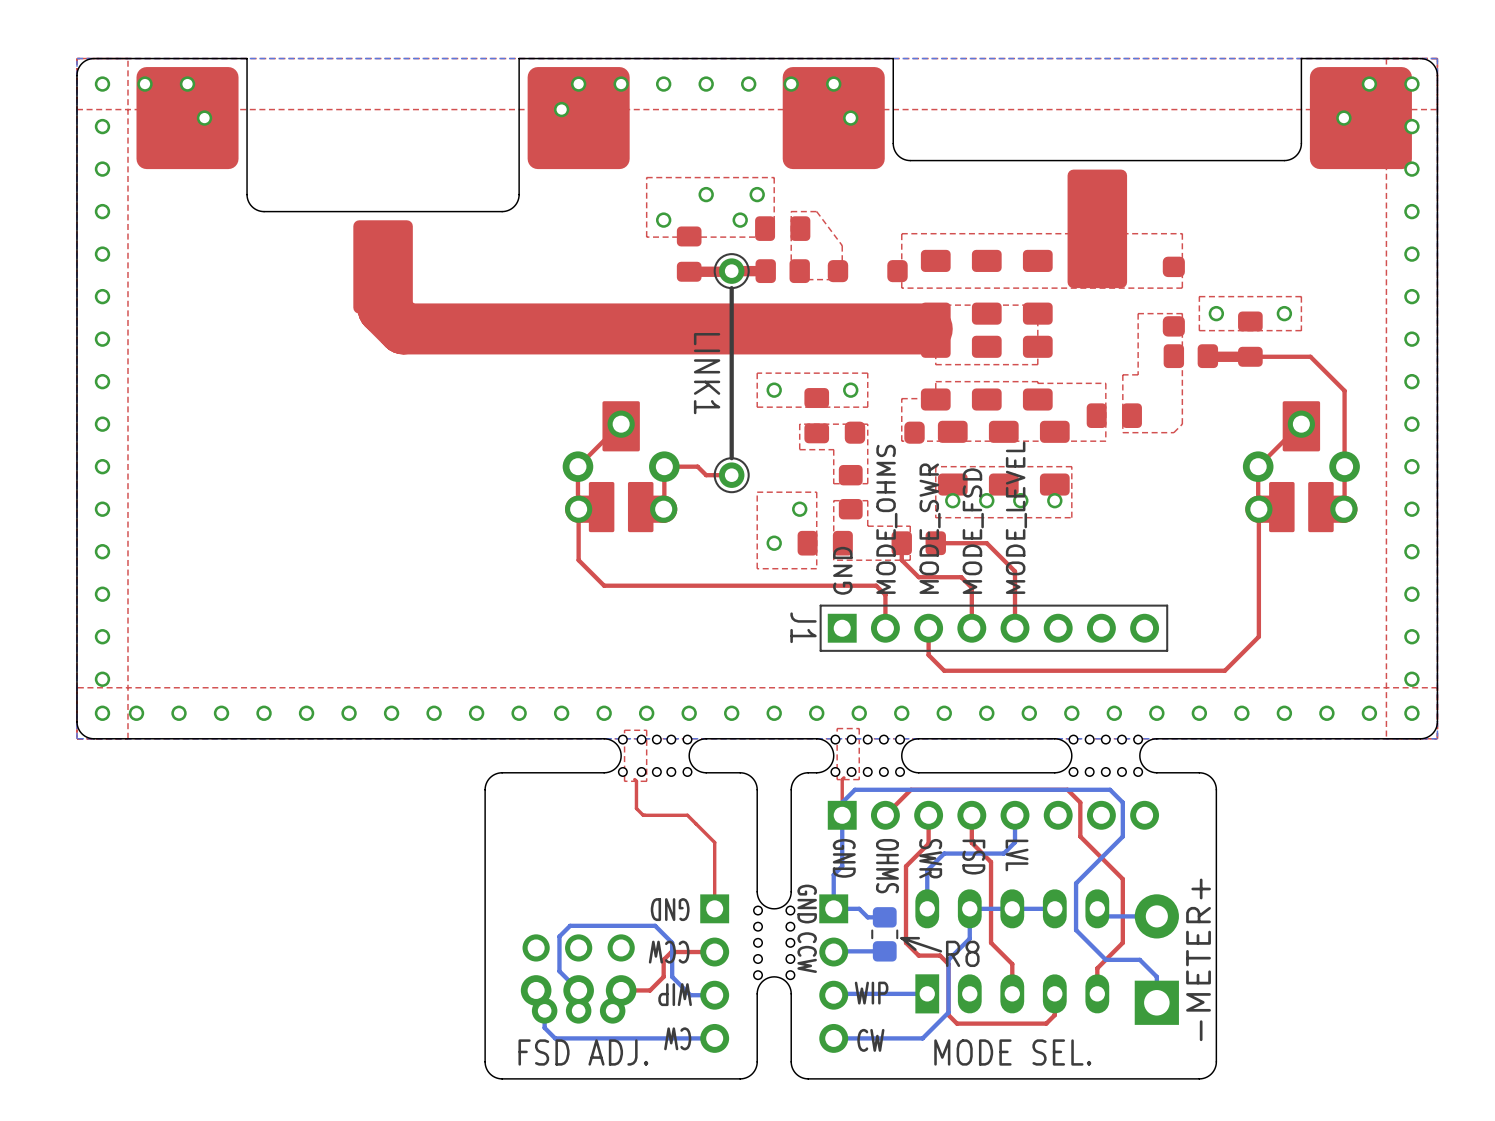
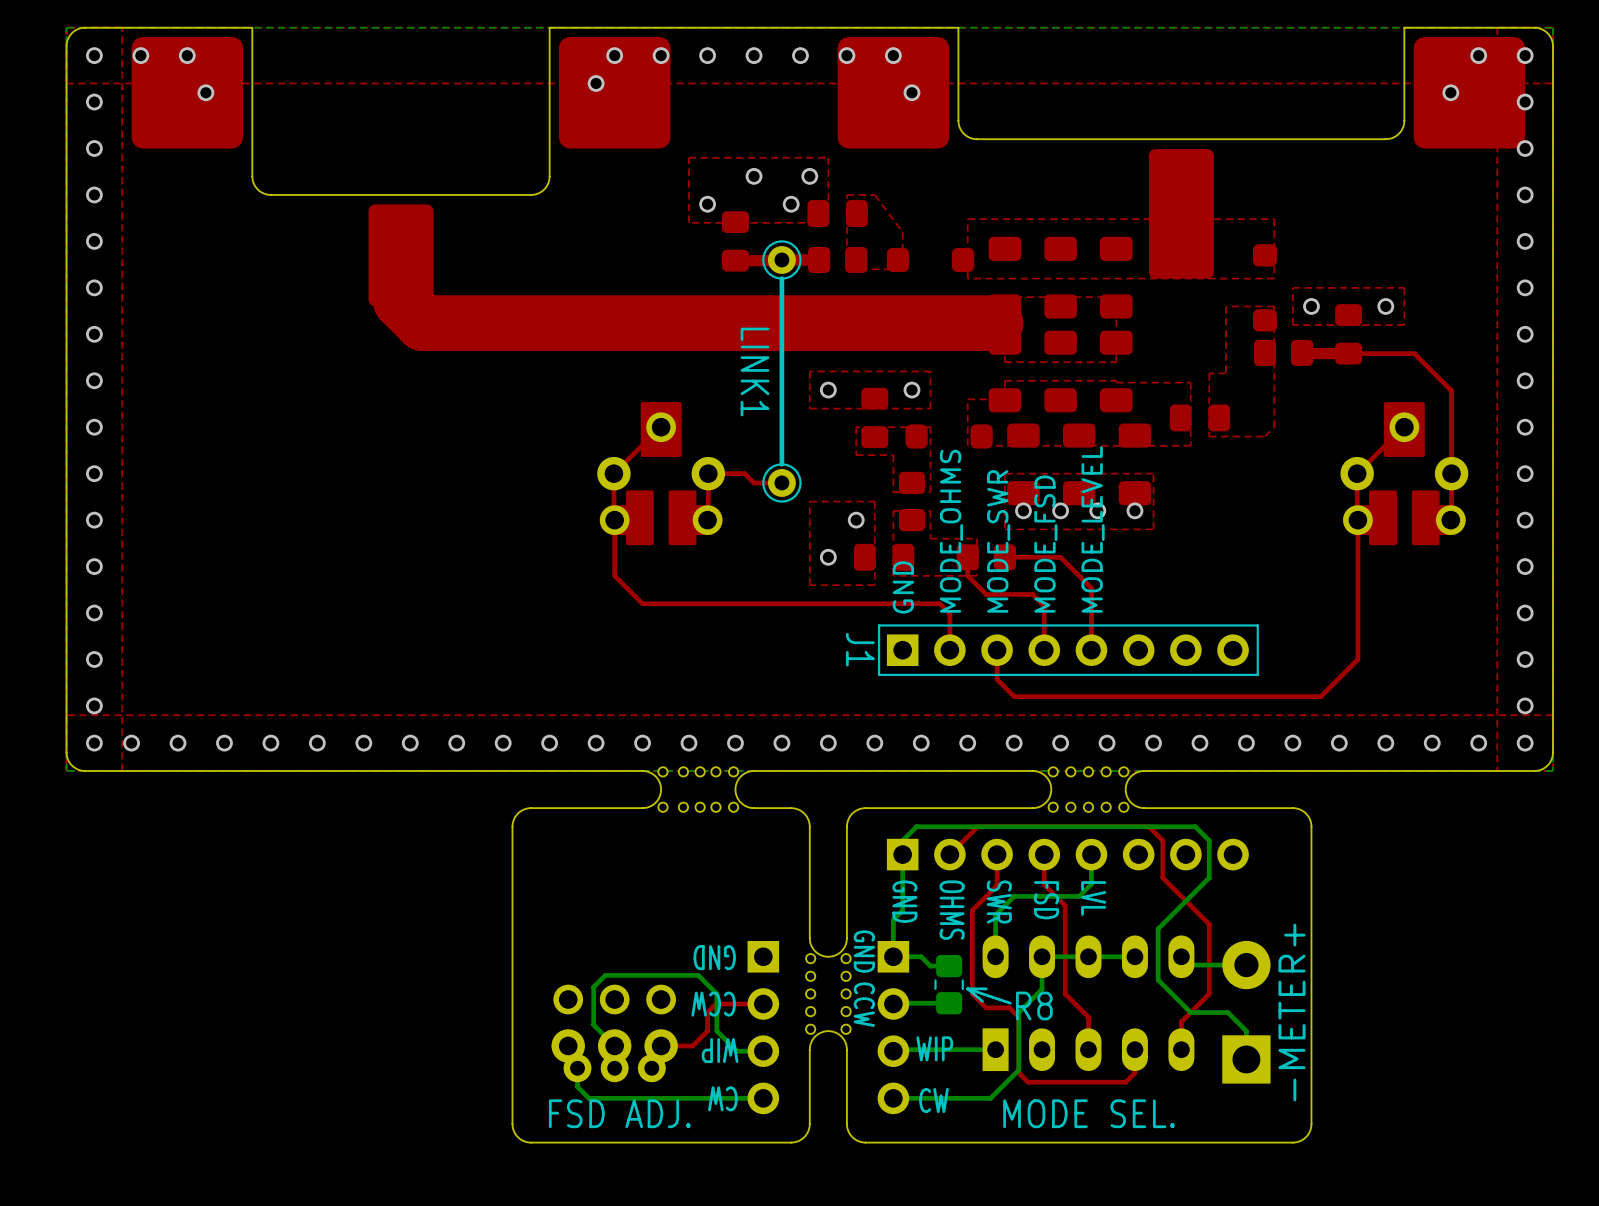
top zone outline: (859, 728) (859, 779) (837, 779) (837, 728) (859, 728) -> none
top zone outline: (646, 730) (646, 781) (624, 781) (624, 730) (646, 730) -> none
board edge: none -> (986, 770) (874, 770)
board edge: (1054, 738) (961, 738) -> (1246, 770) (1144, 770)
part: (867, 755) -> none
part: none -> (1088, 789)
part: (1105, 755) -> none
board edge: none -> (986, 808) (874, 808)
board edge: (1054, 772) (961, 772) -> (1246, 808) (1144, 808)
top track: (843, 777) (842, 779) (842, 815) -> none
top track: (634, 779) (636, 781) (636, 808) (643, 815) (687, 815) (714, 842) (714, 908) -> none

